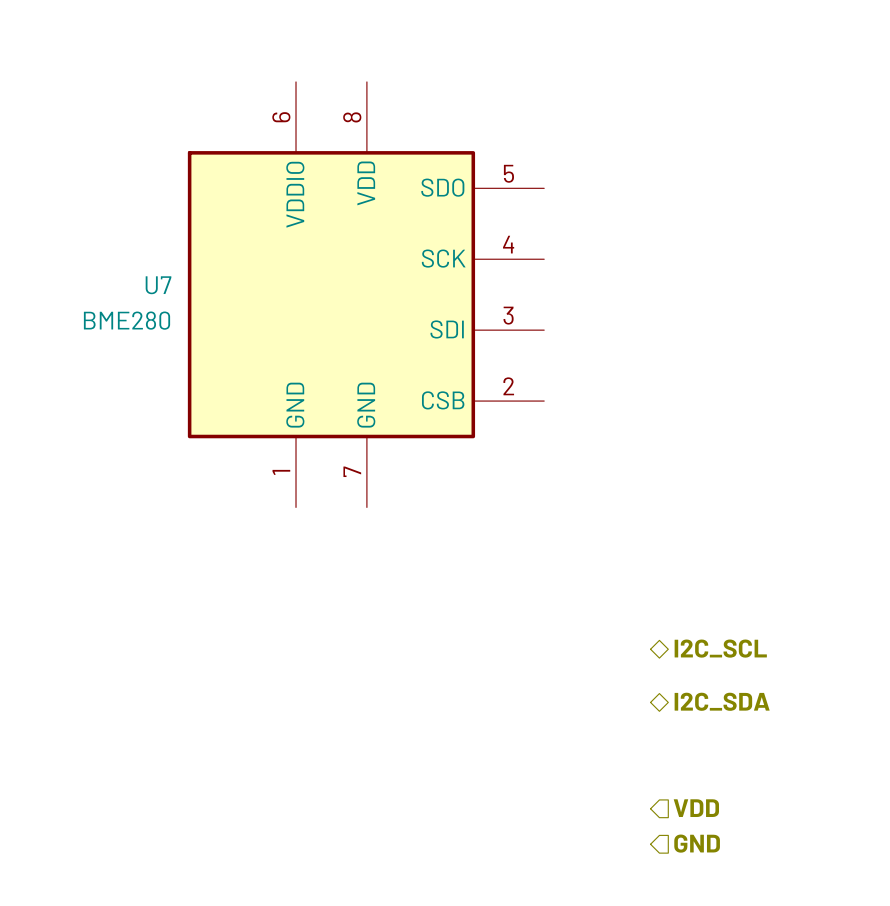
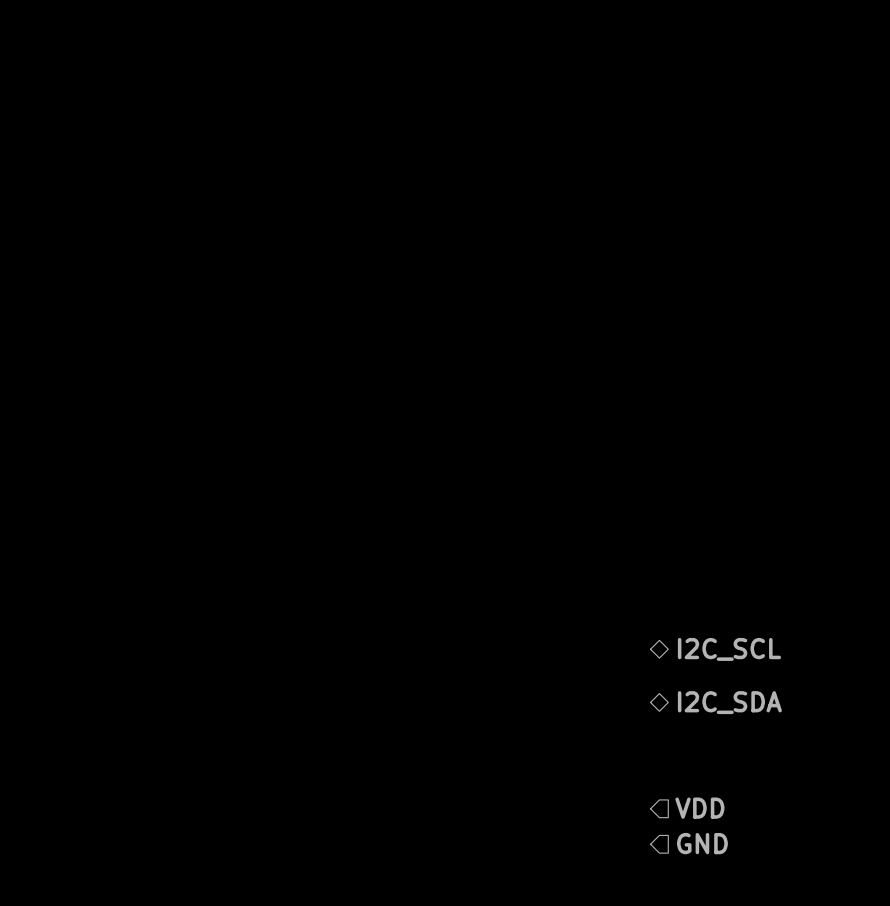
U7: BME280 (366, 294) -> none

